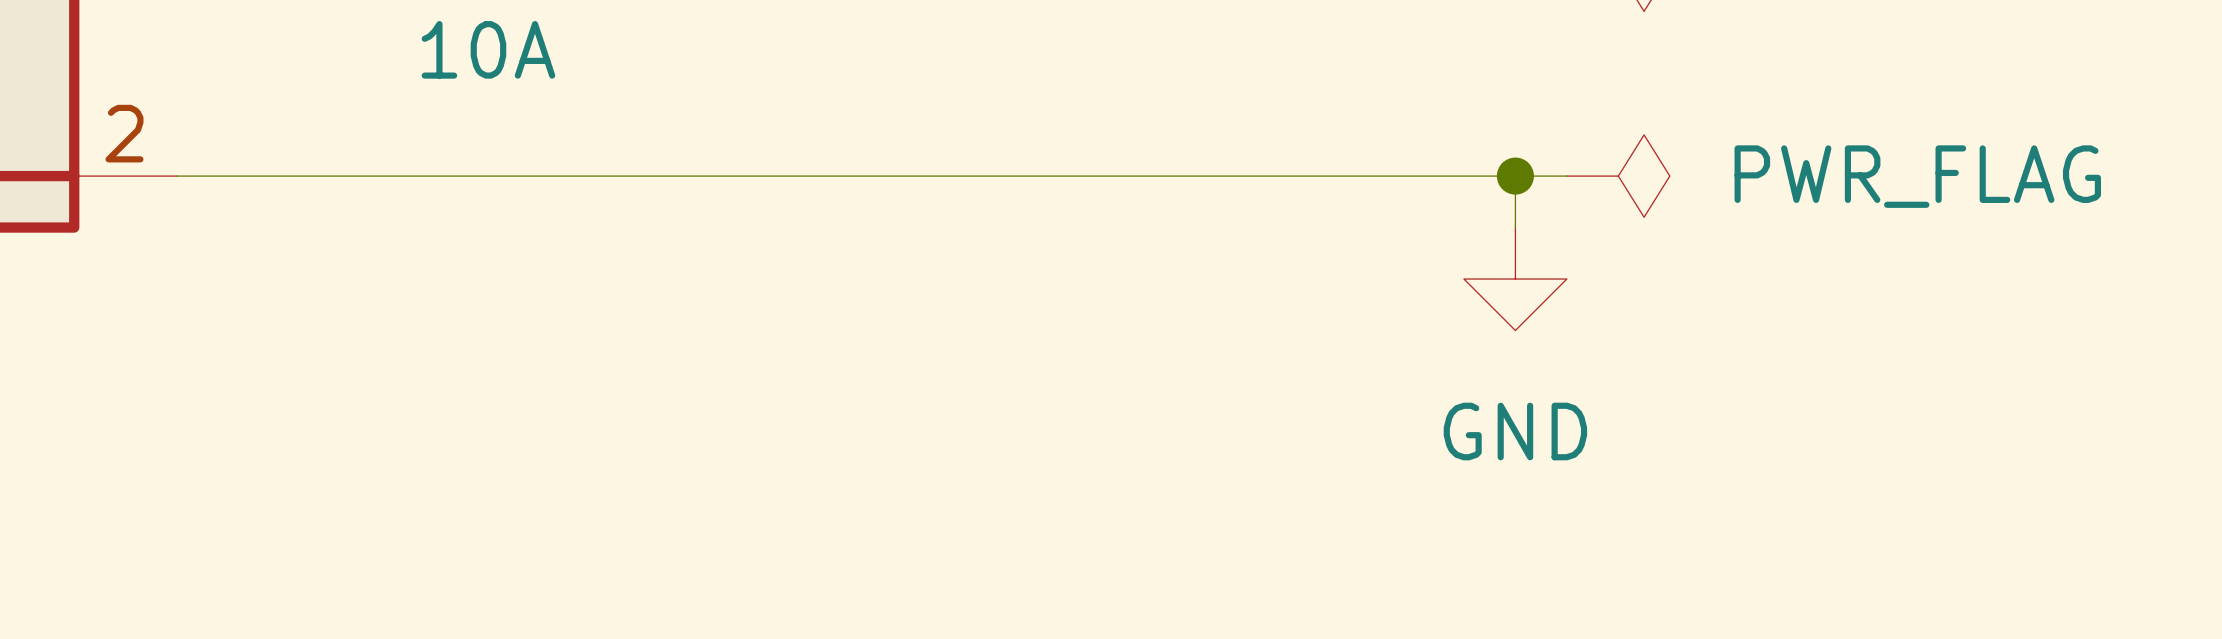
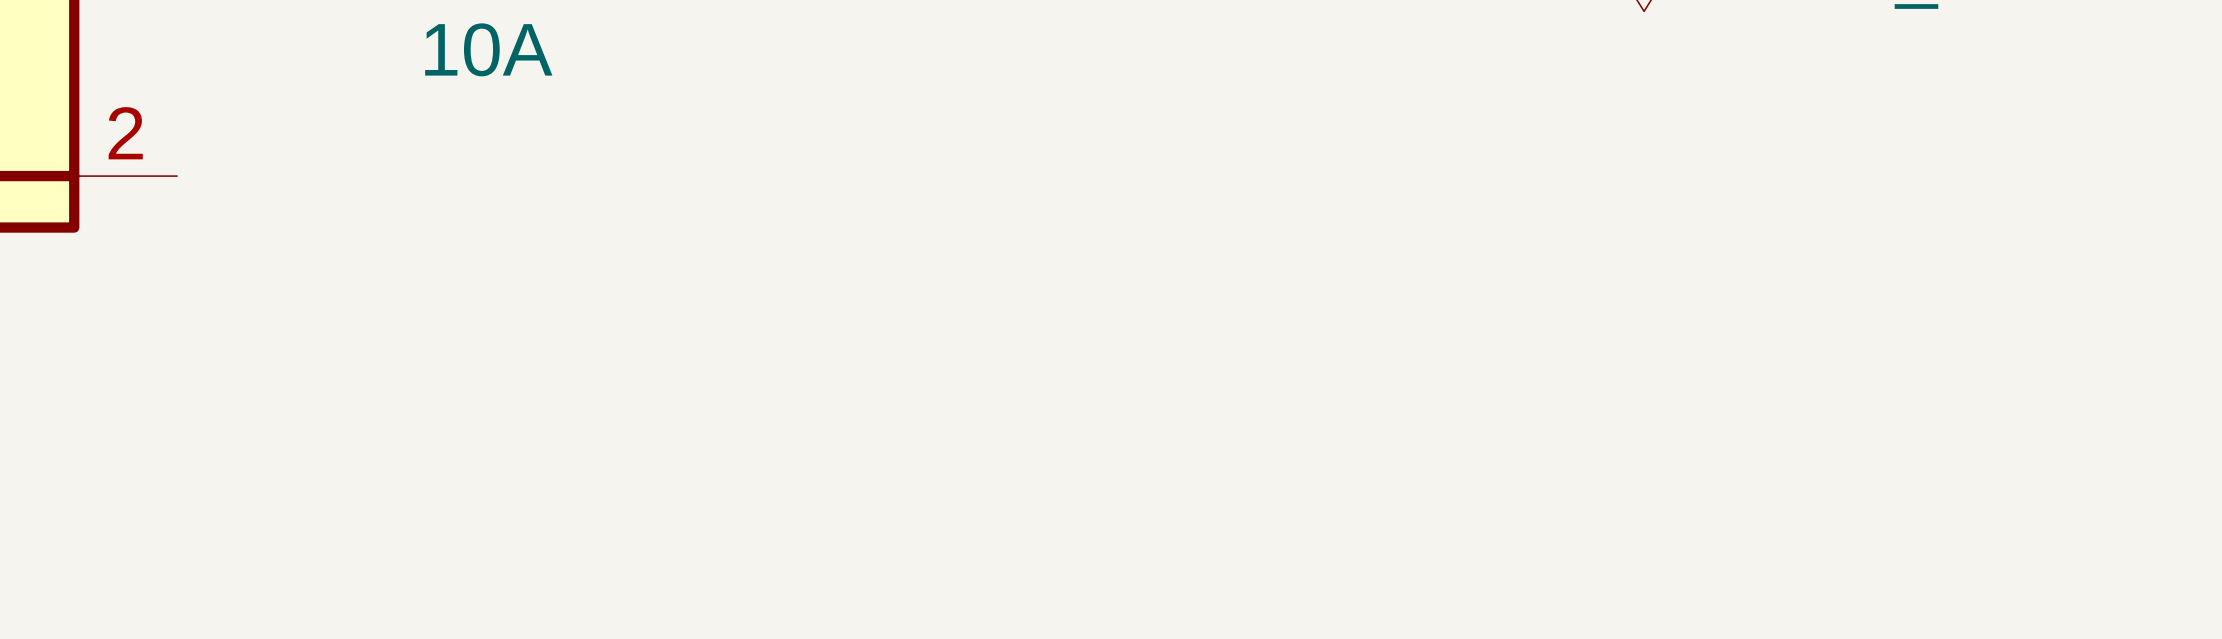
wire: (177, 176) (1566, 176) -> none
wire: (1515, 176) (1515, 227) -> none
junction: (1515, 176) -> none
power symbol: PWR_FLAG (1618, 176) -> none
power symbol: GND (1515, 279) -> none

